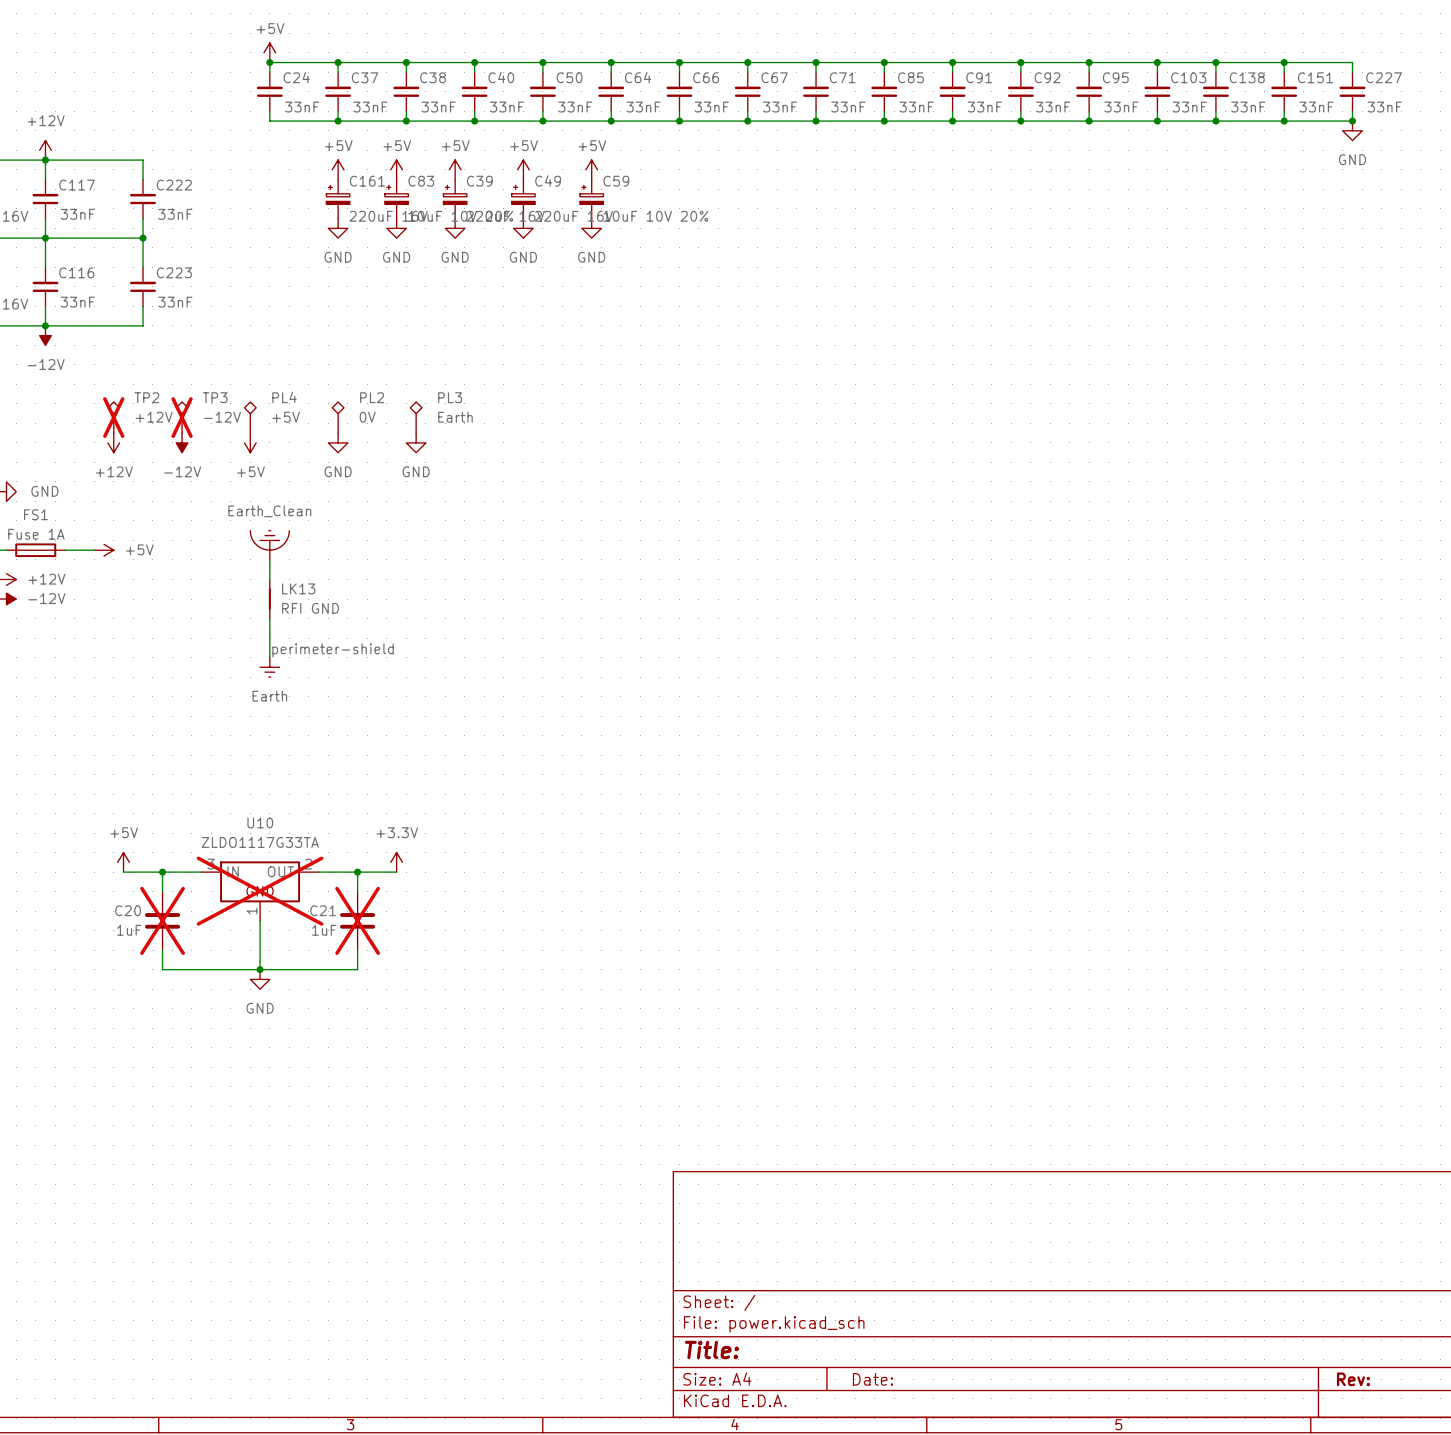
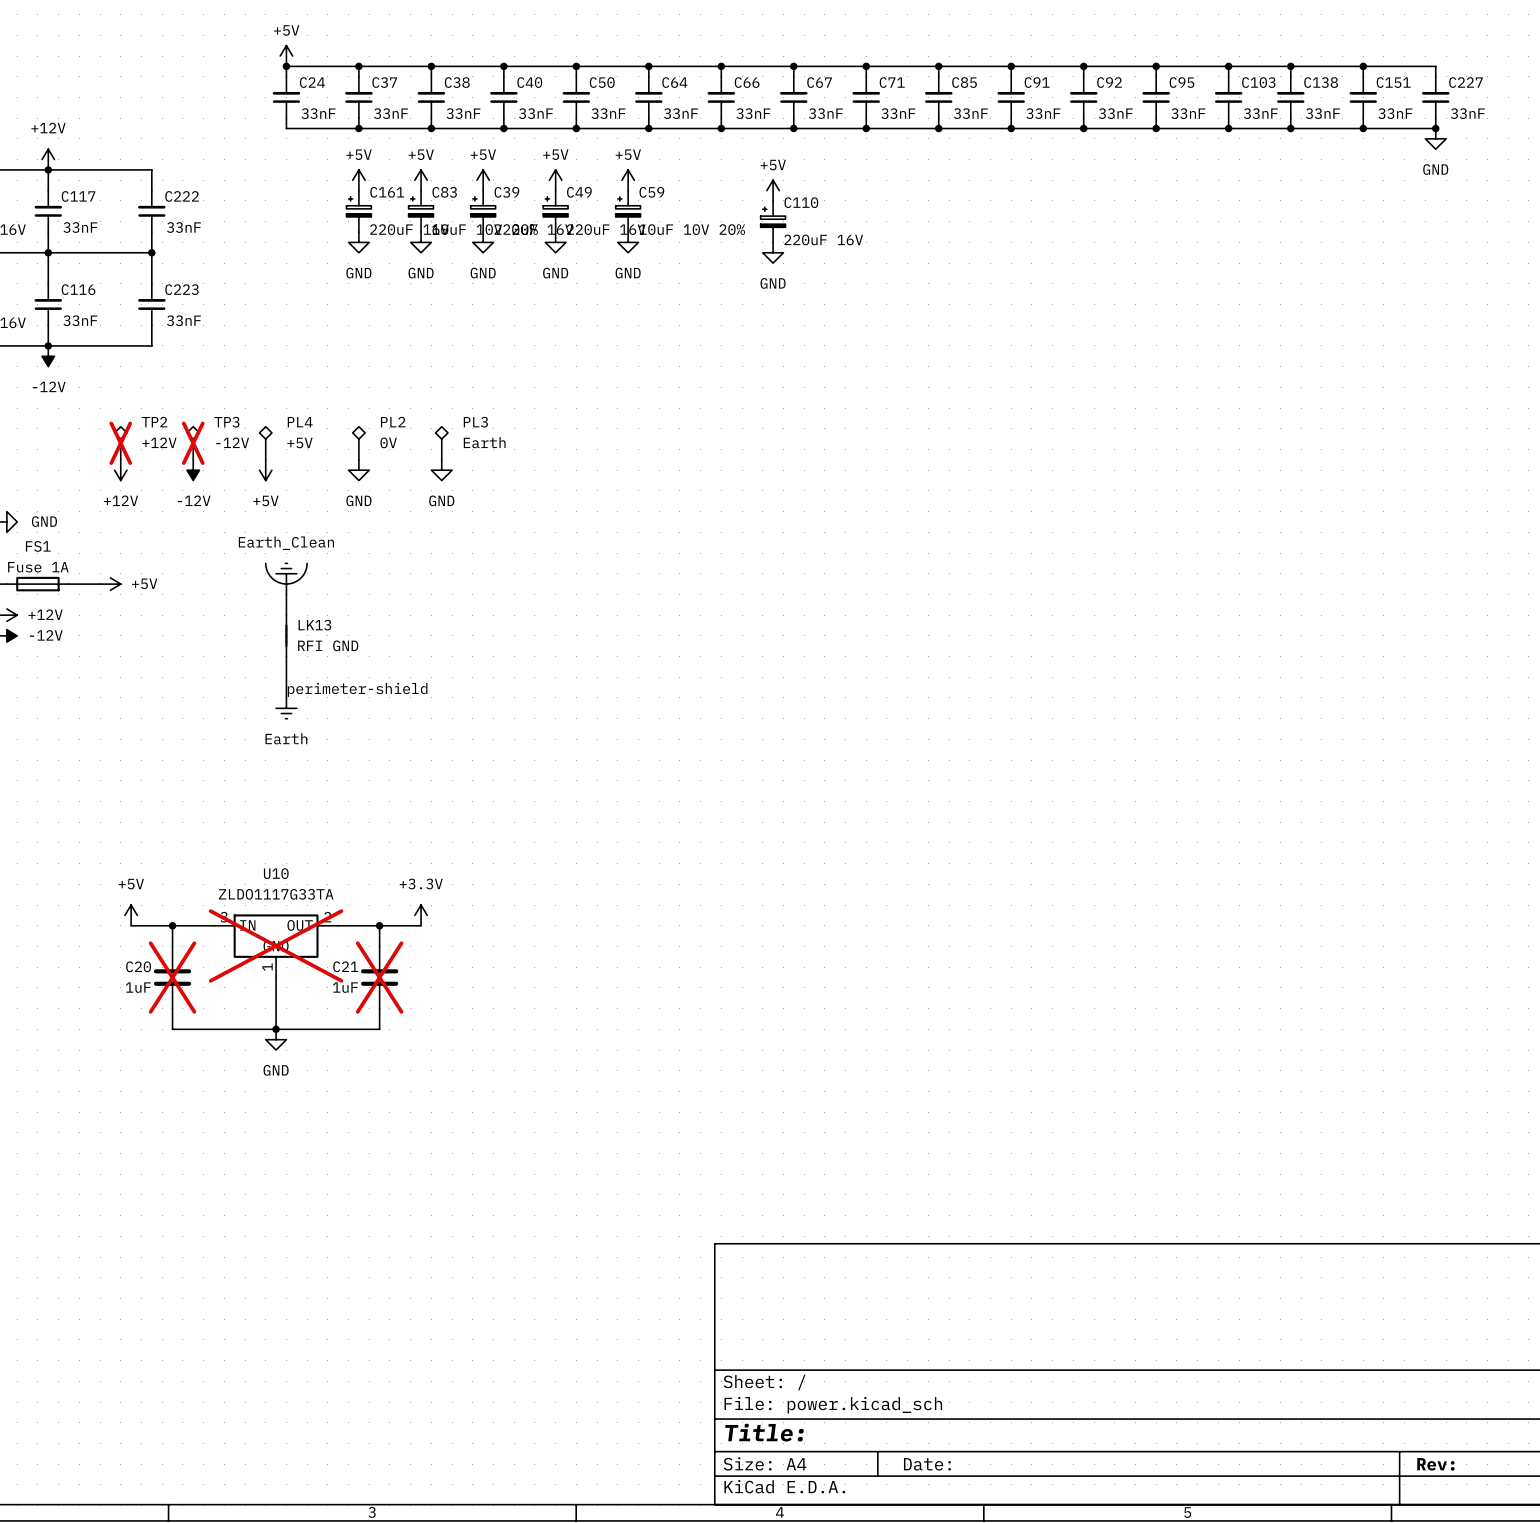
power symbol: none -> +5V (773, 190)
C110: none -> 220uF 16V (773, 221)
power symbol: none -> GND (773, 252)

